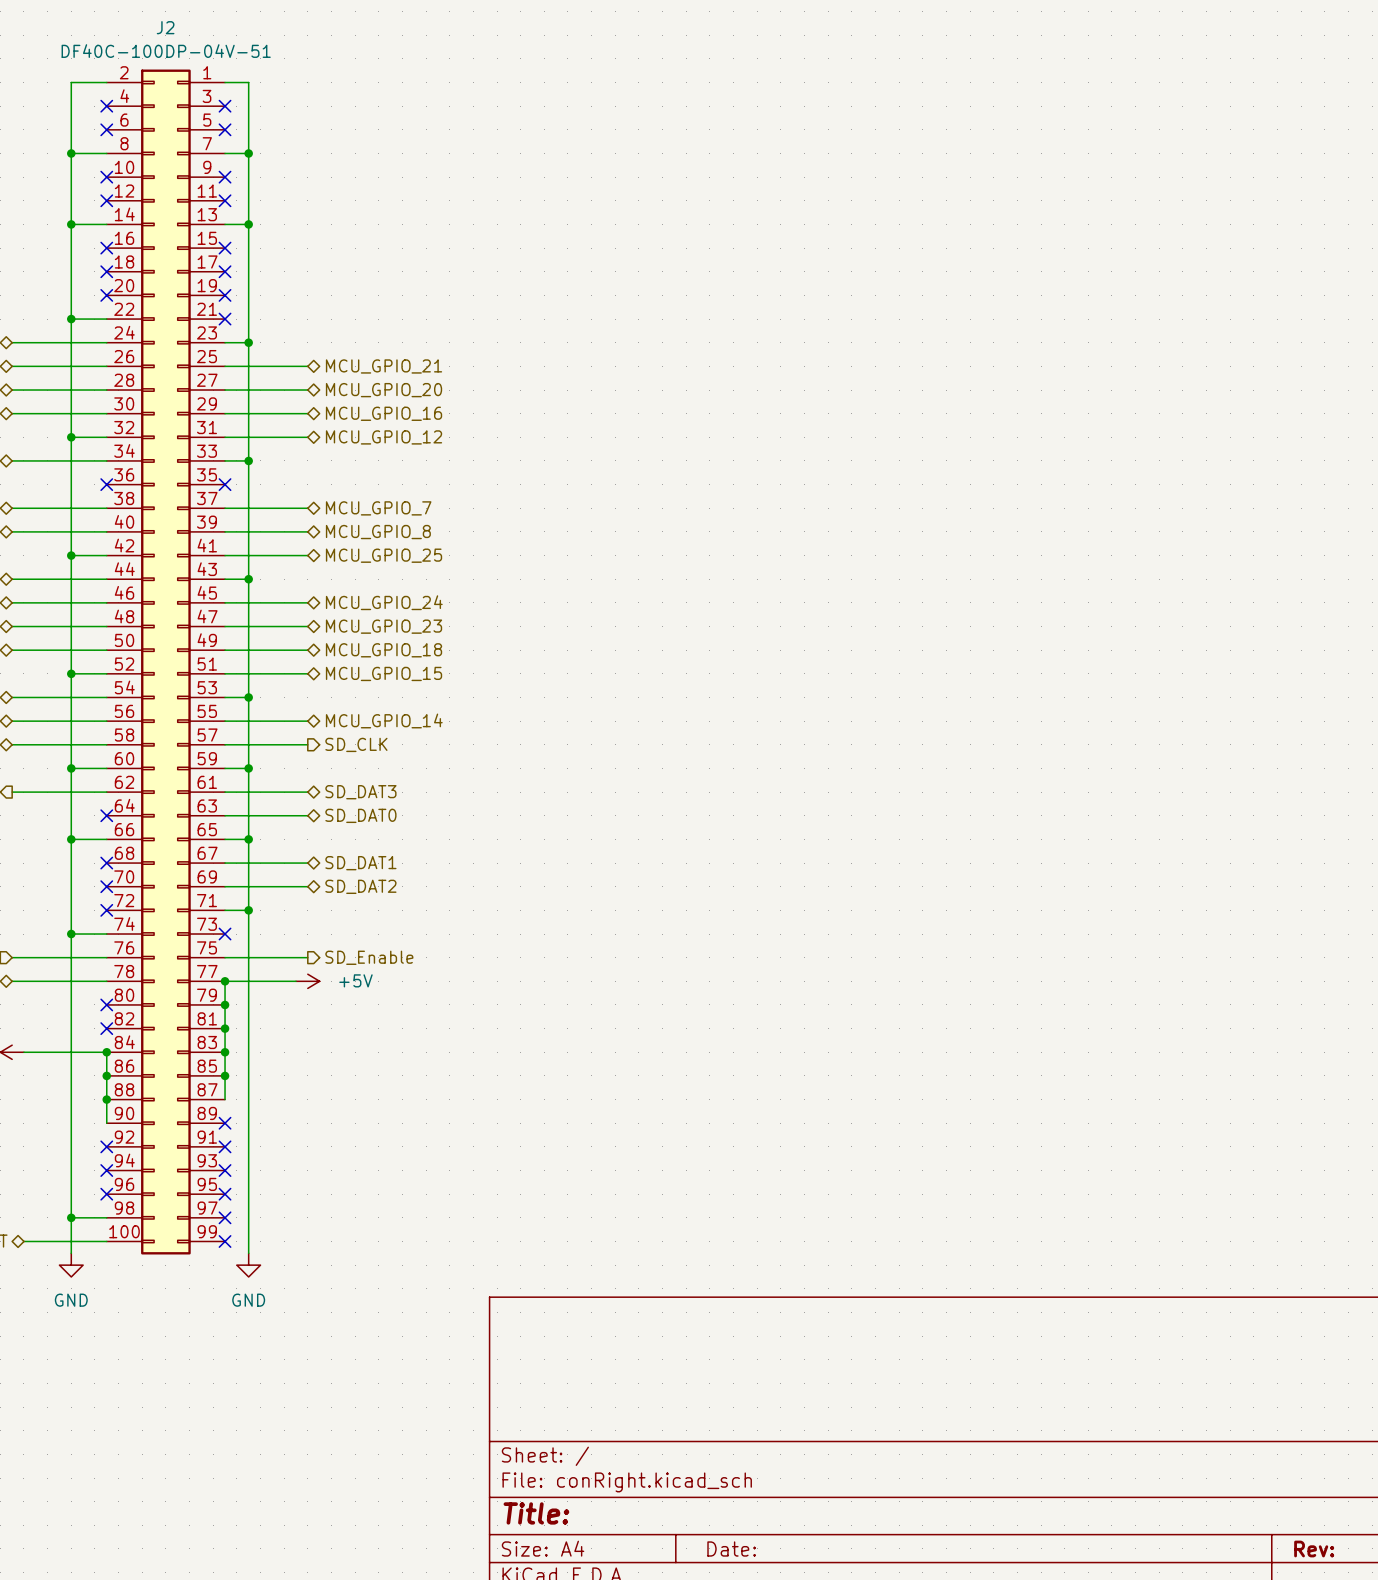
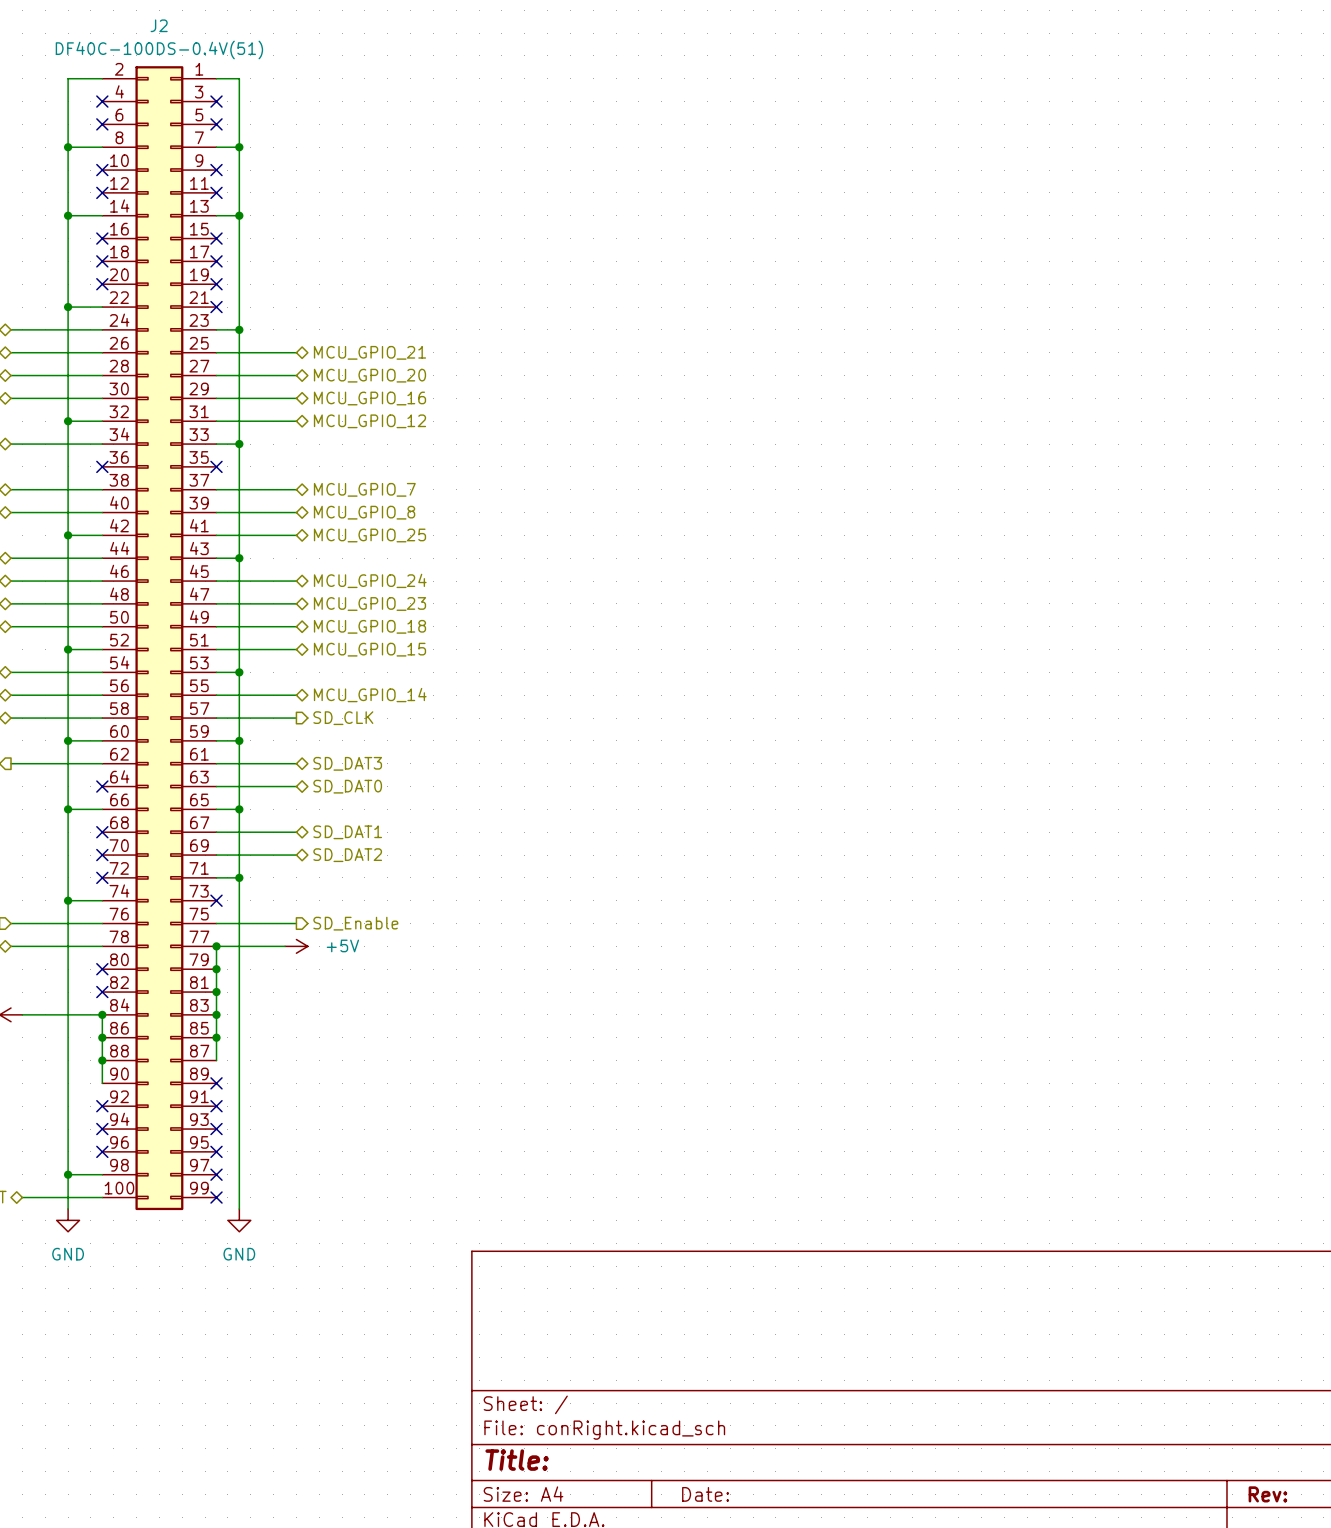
J2 value: DF40C-100DP-04V-51 (166, 51) -> DF40C-100DS-0.4V(51) (159, 49)

